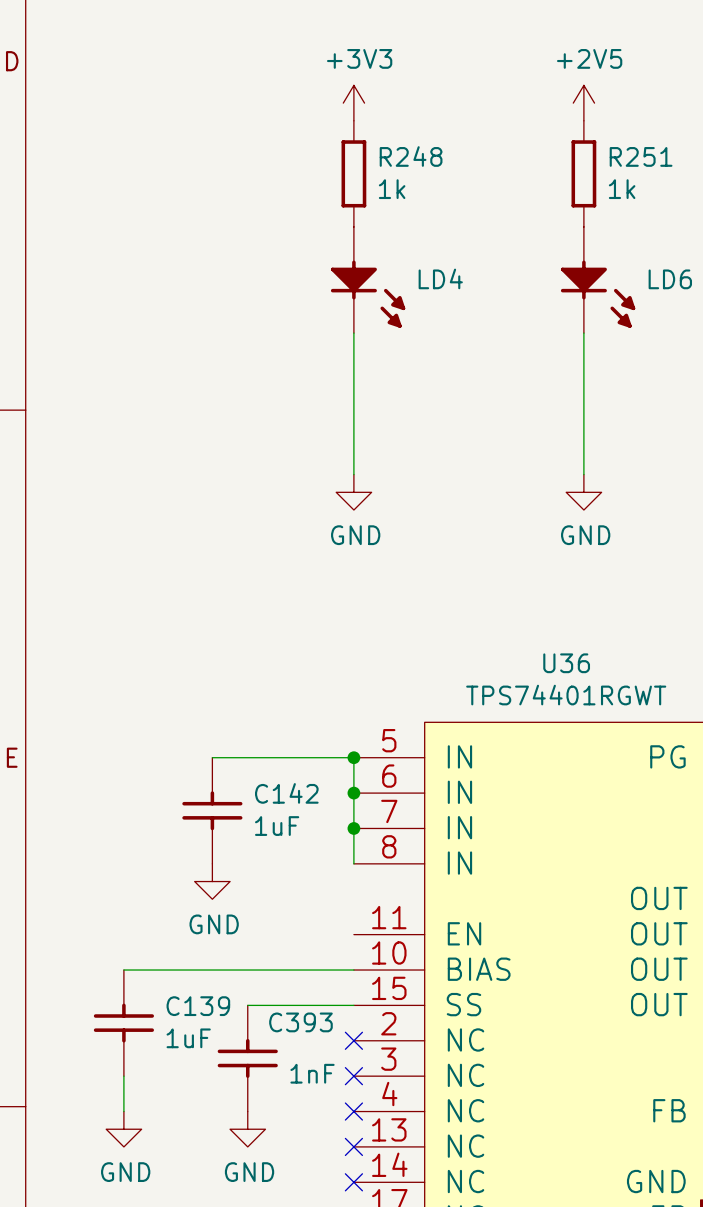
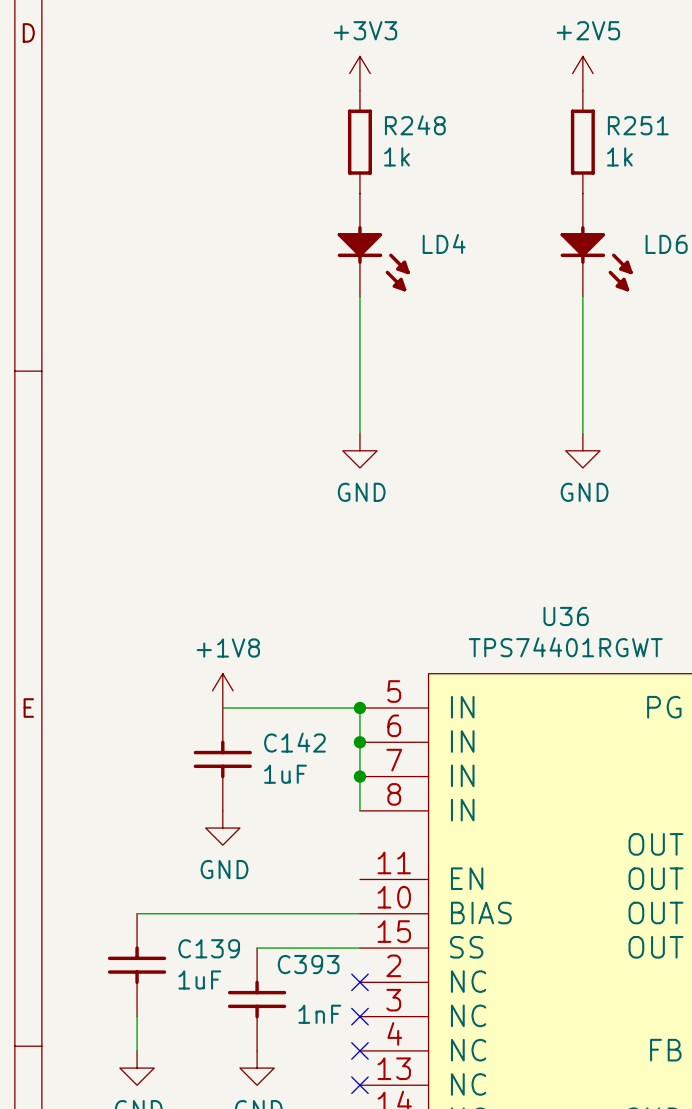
power symbol: none -> +1V8 (222, 690)

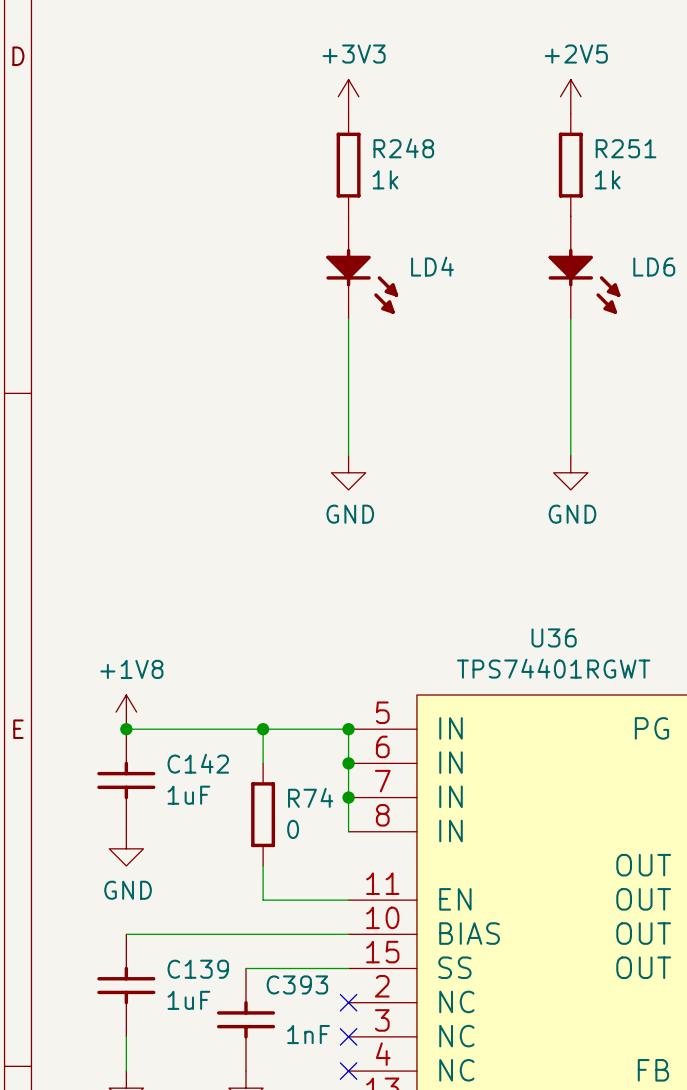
power symbol position: +1V8 (222, 690) -> +1V8 (126, 712)
wire: none -> (126, 729) (211, 729)
junction: none -> (126, 729)
wire: none -> (263, 729) (263, 763)
junction: none -> (263, 729)
C142 position: (222, 759) -> (126, 780)
R74: none -> (263, 814)
power symbol position: GND (222, 828) -> GND (126, 848)
wire: none -> (263, 865) (263, 900) (348, 900)

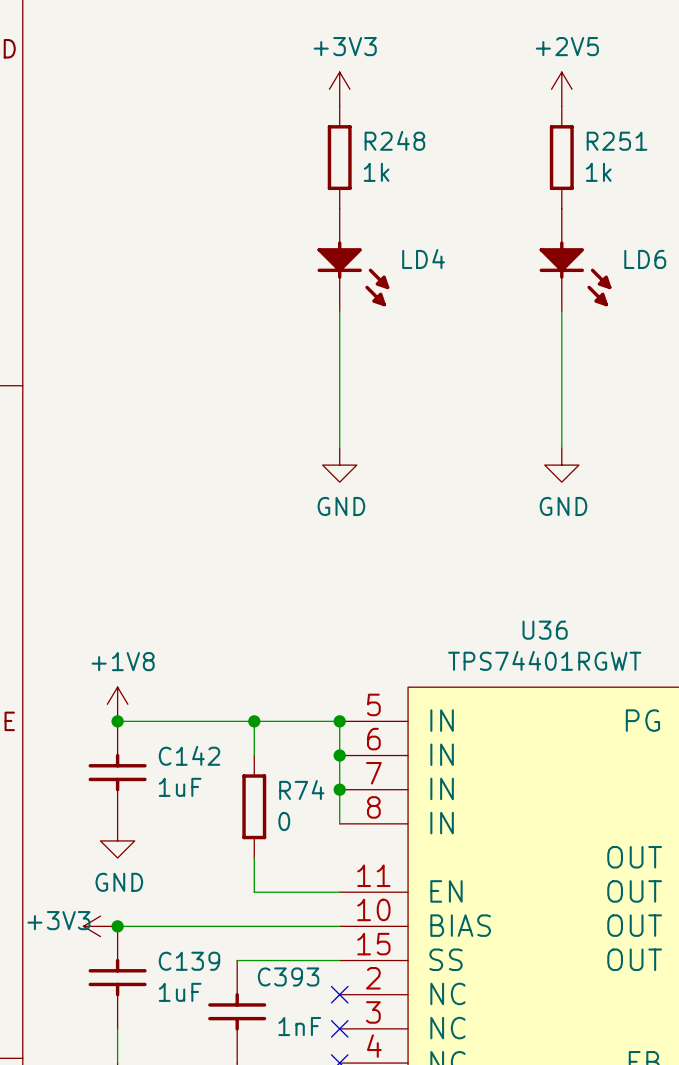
power symbol: none -> +3V3 (100, 926)
junction: none -> (117, 926)

